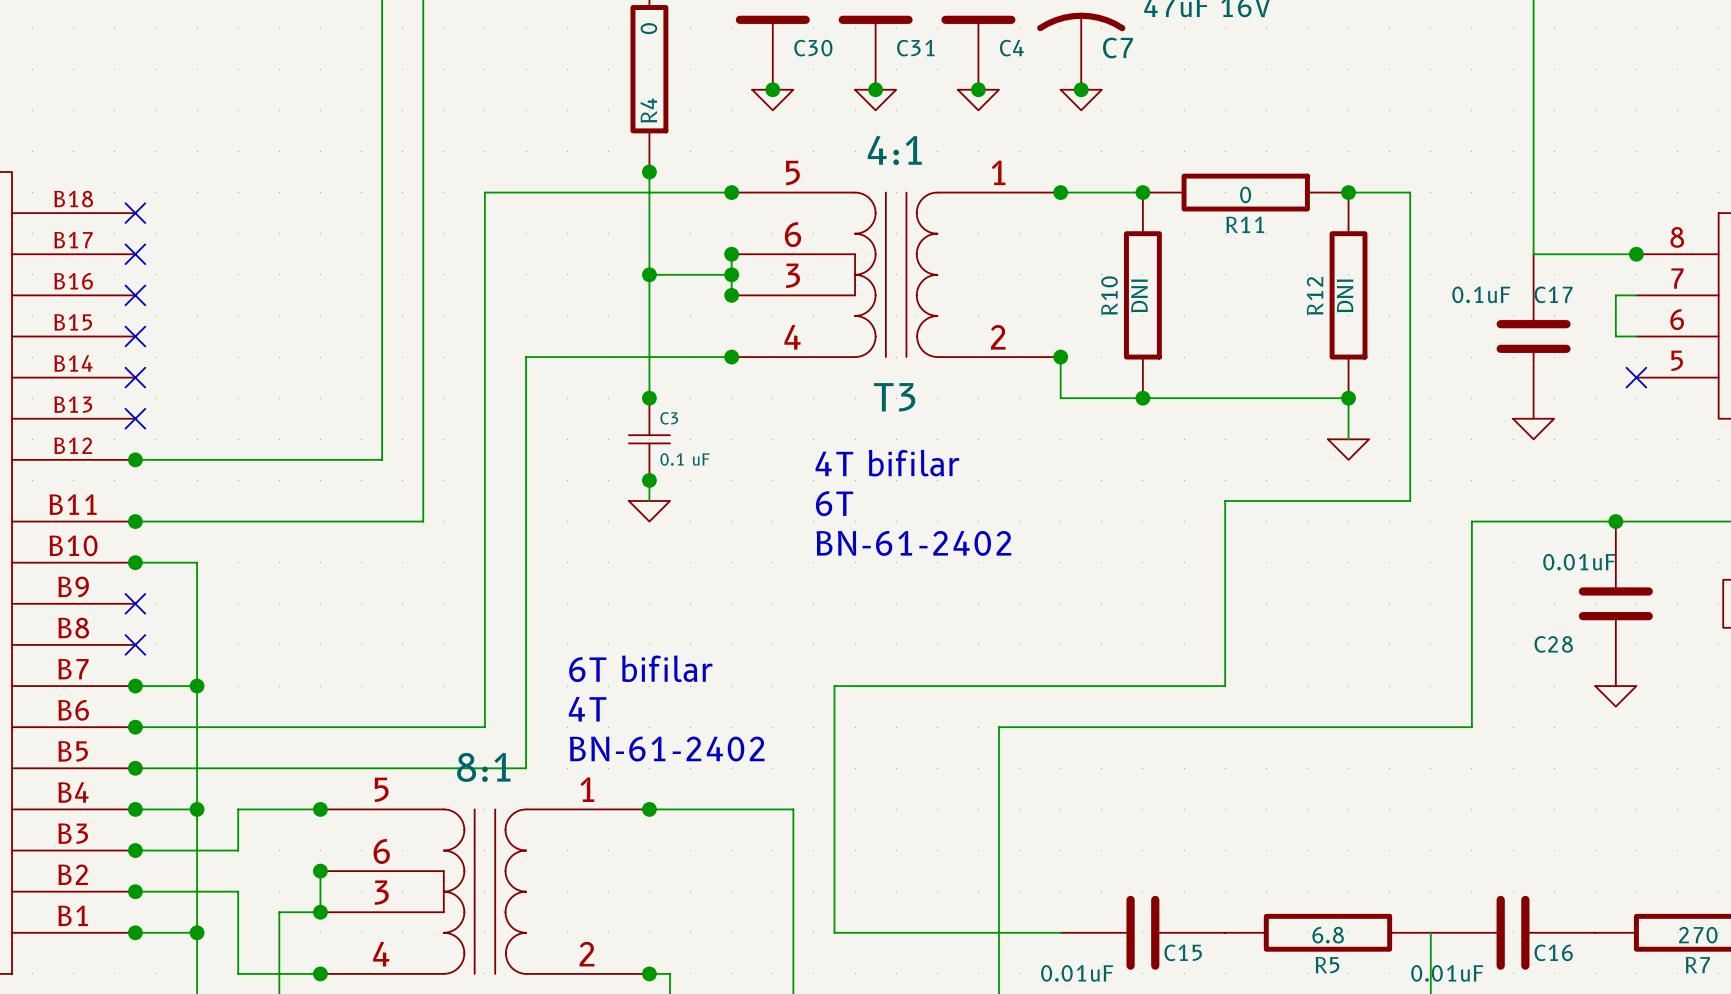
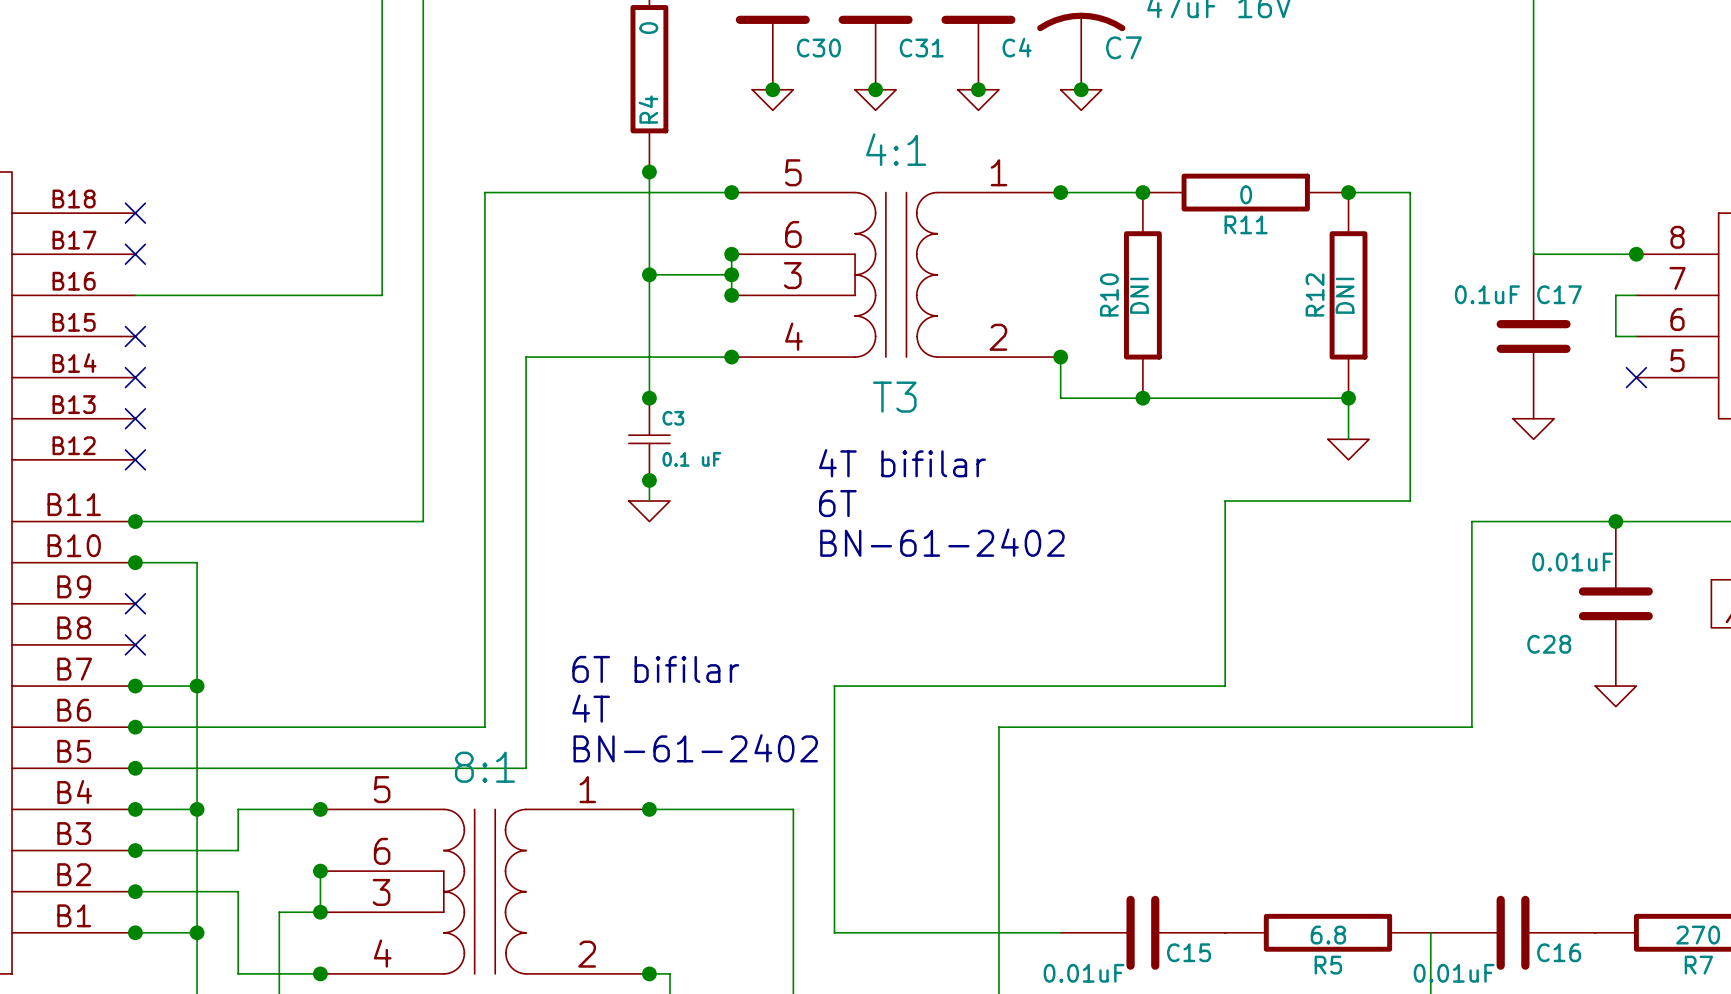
no-connect mark: (135, 295) -> none
wire: (382, 295) (382, 459) (135, 459) -> (382, 295) (135, 295)
junction: (135, 459) -> none
no-connect mark: none -> (135, 459)

